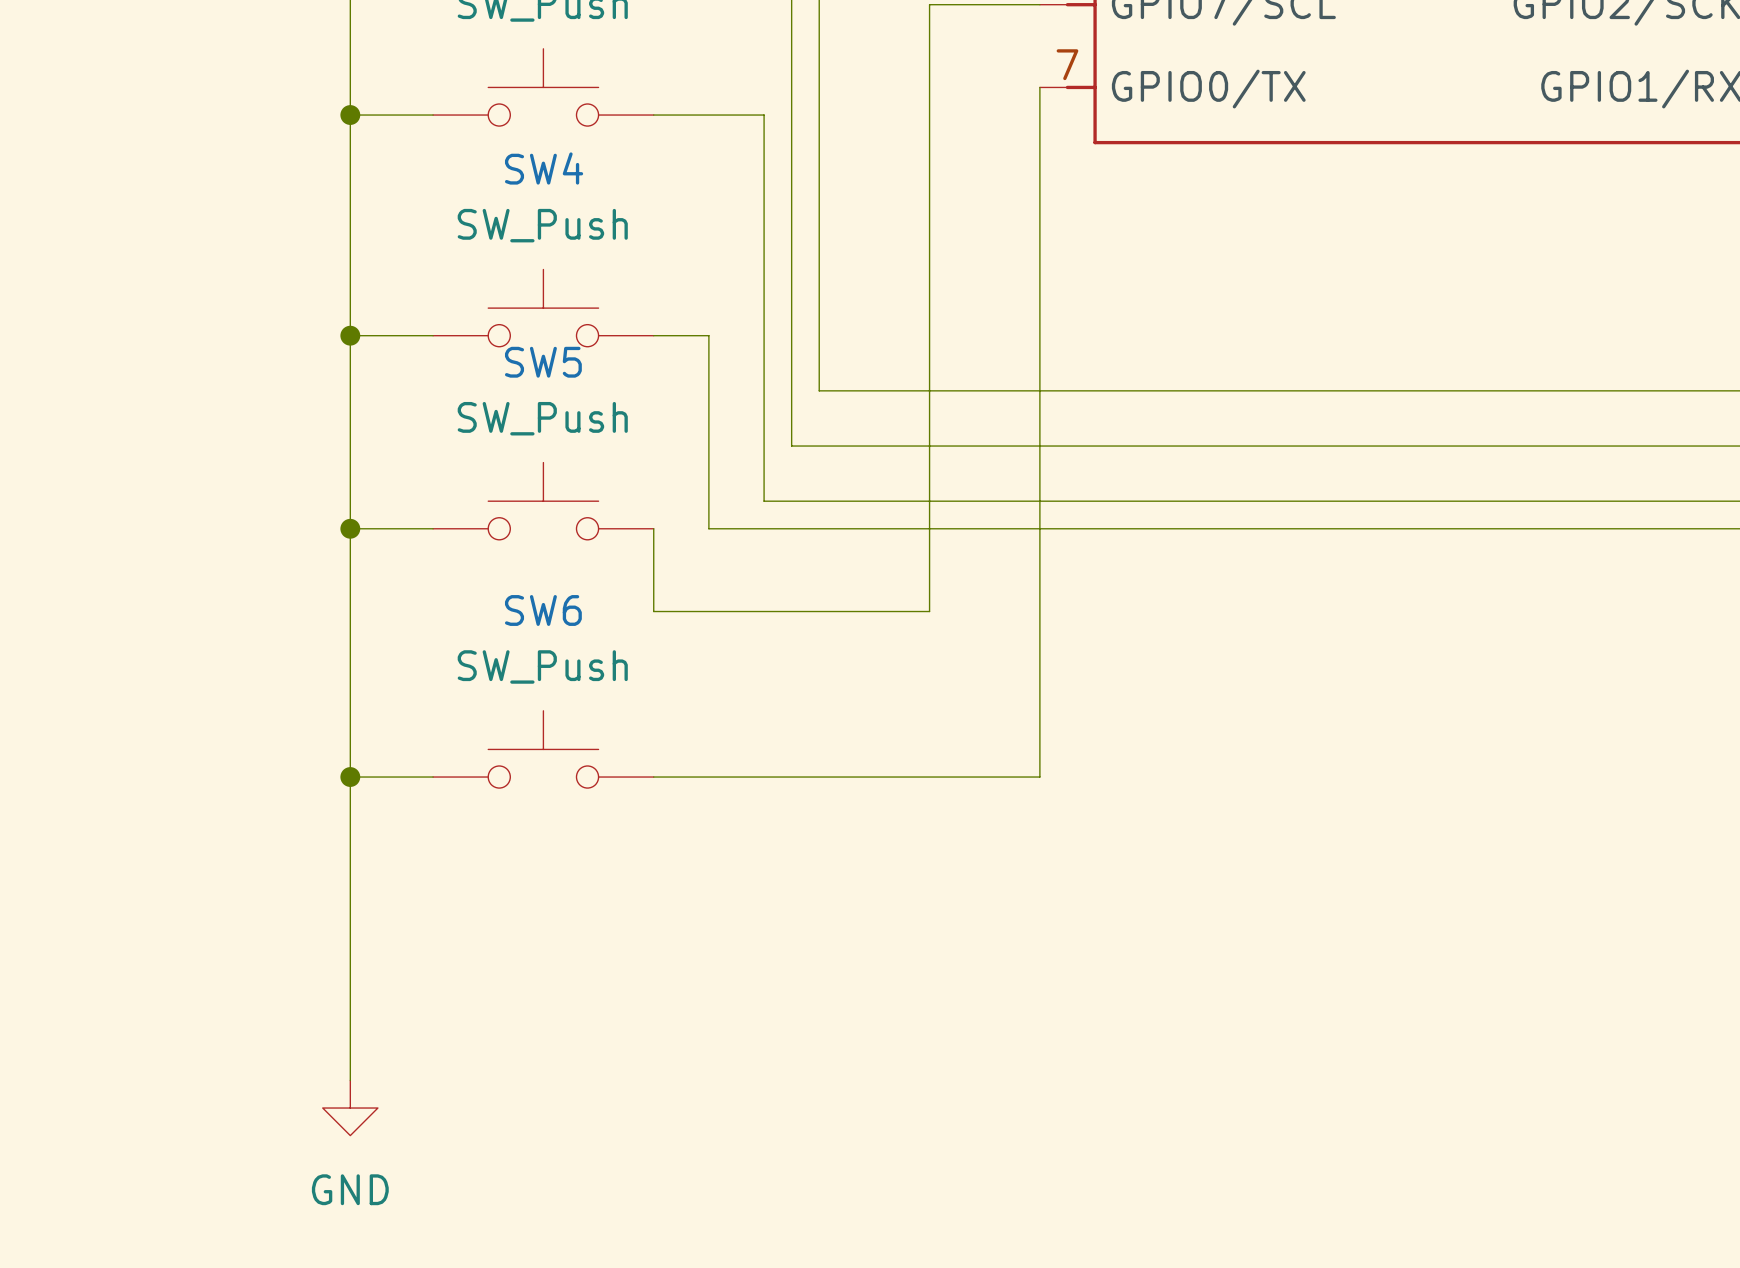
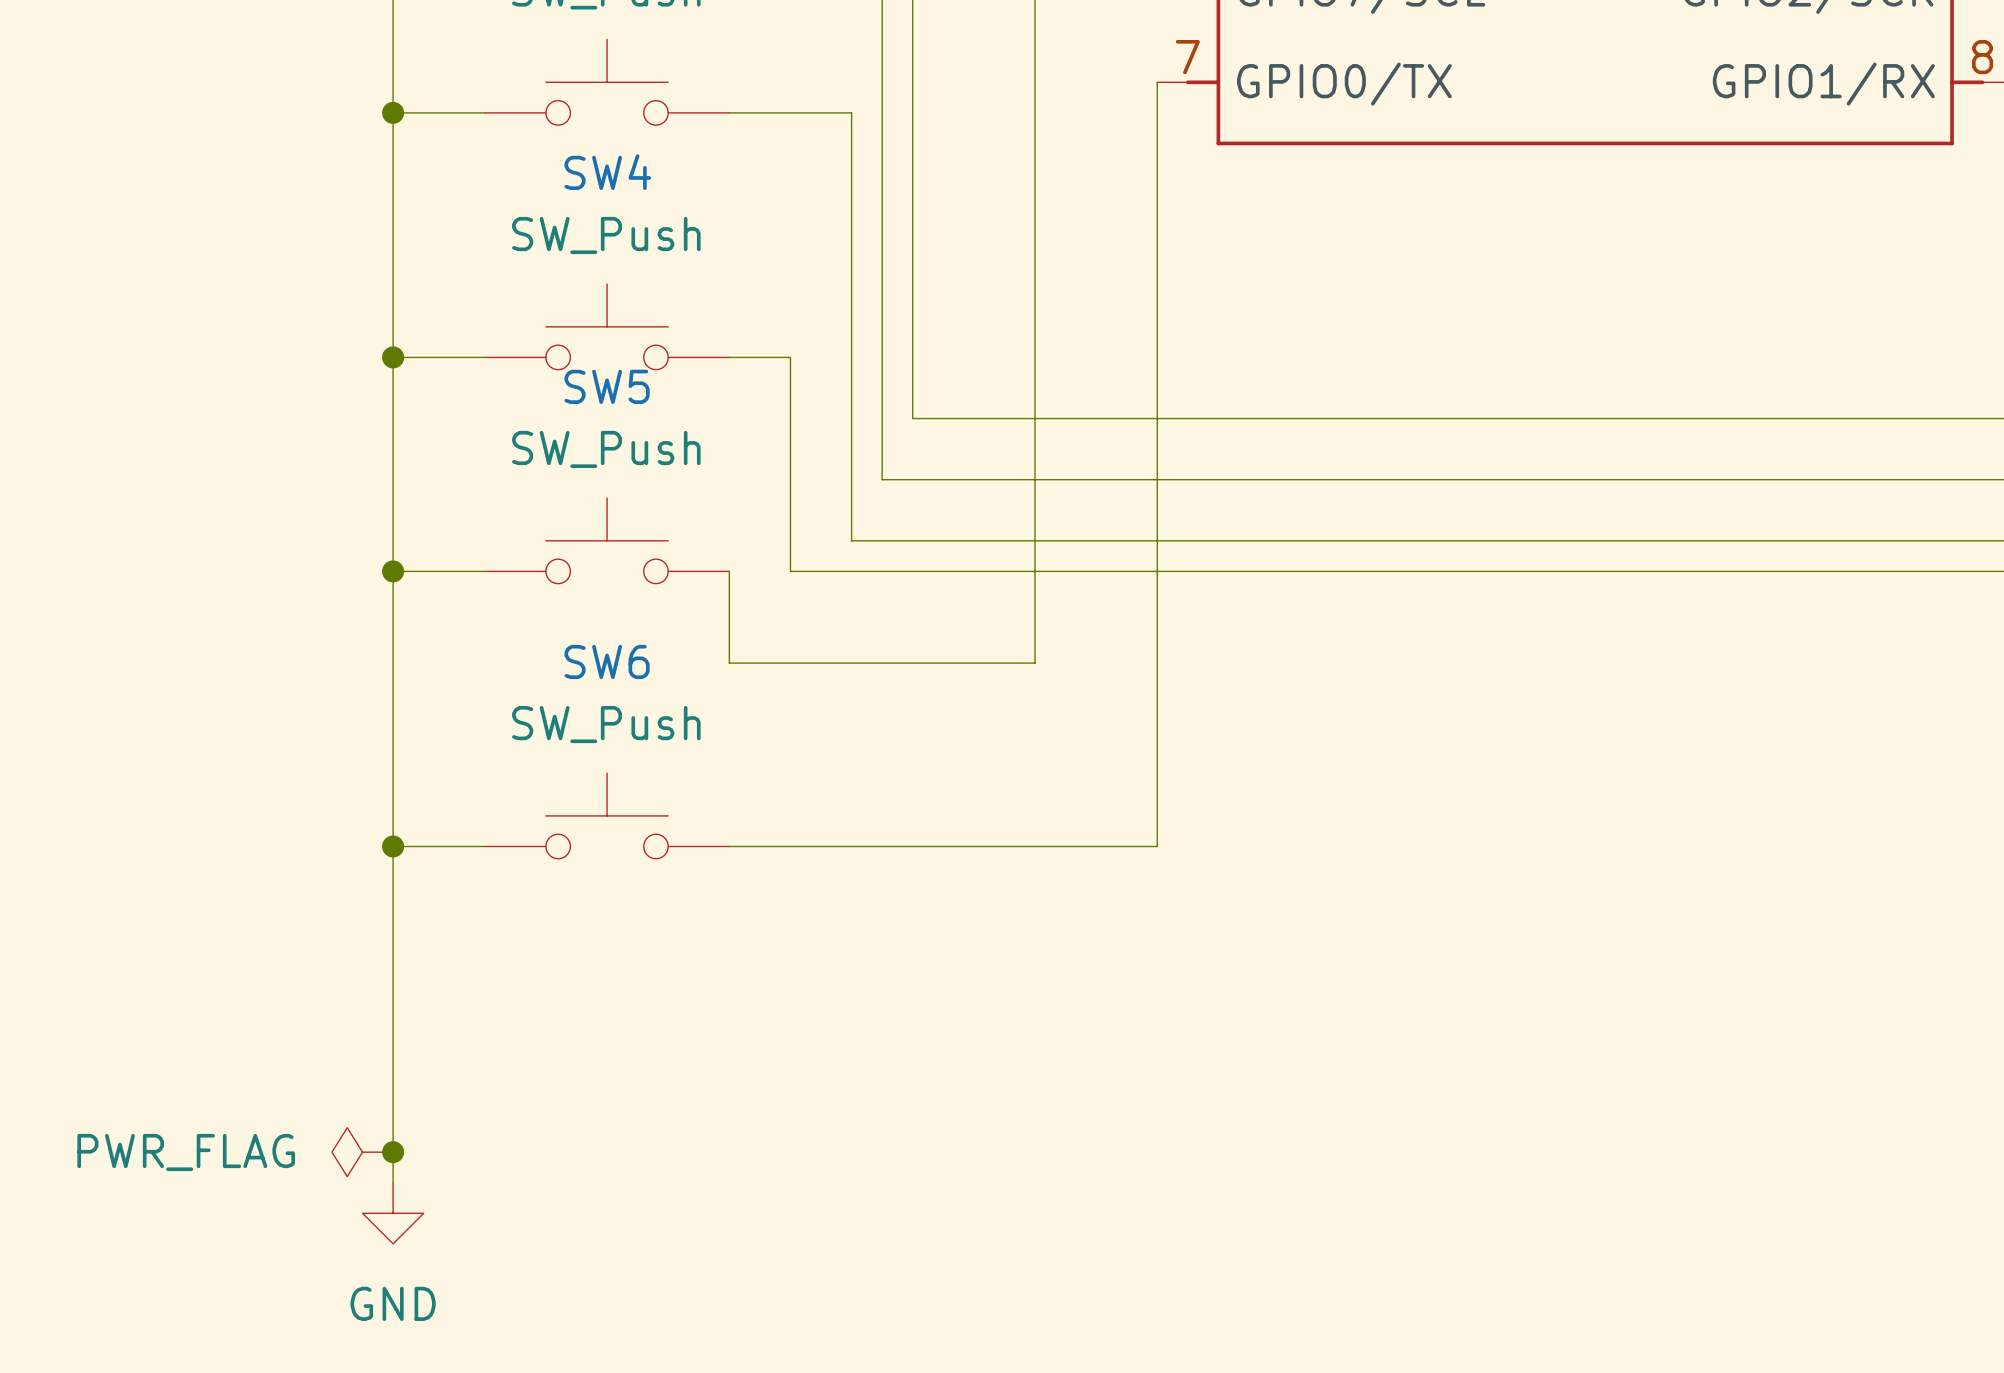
power symbol: none -> PWR_FLAG (362, 1152)
junction: none -> (393, 1152)

